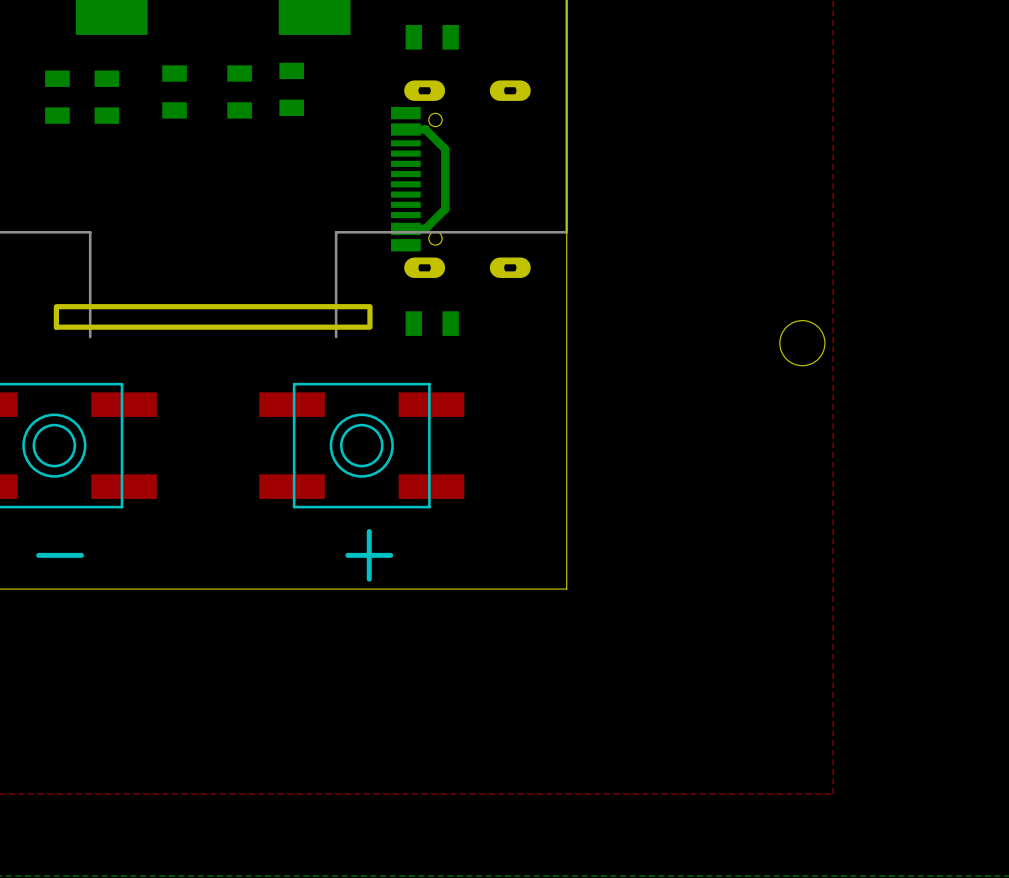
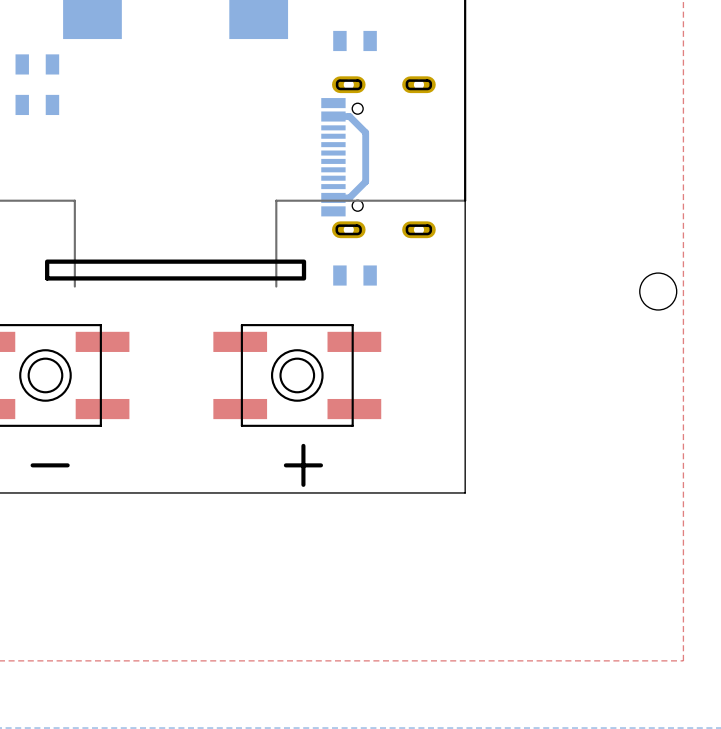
part: none -> (37, 64)
part: (291, 89) -> none
part: (174, 91) -> none
part: (239, 91) -> none
part: (57, 97) -> none
part: (106, 97) -> none
part: none -> (37, 104)

